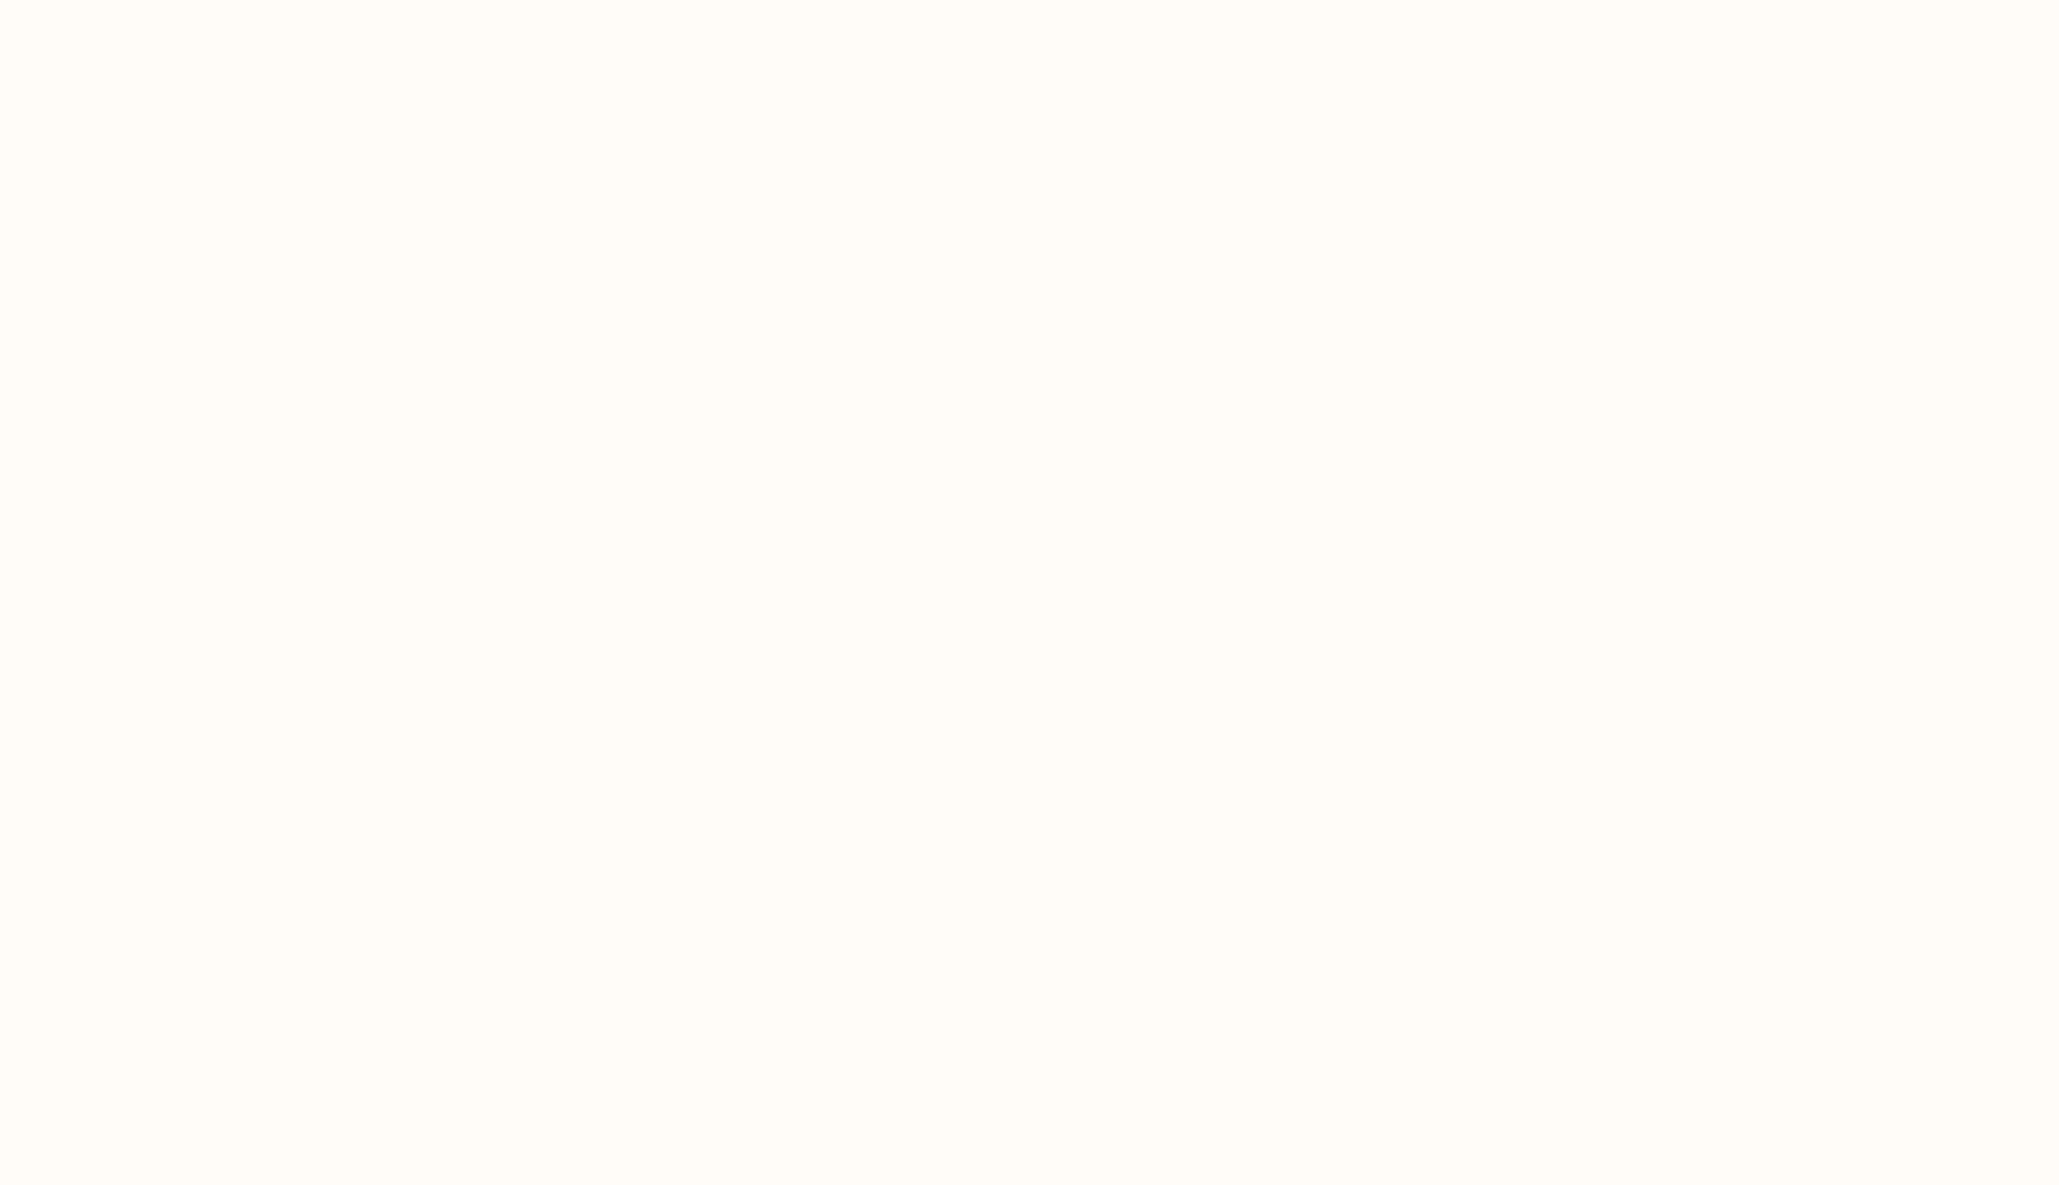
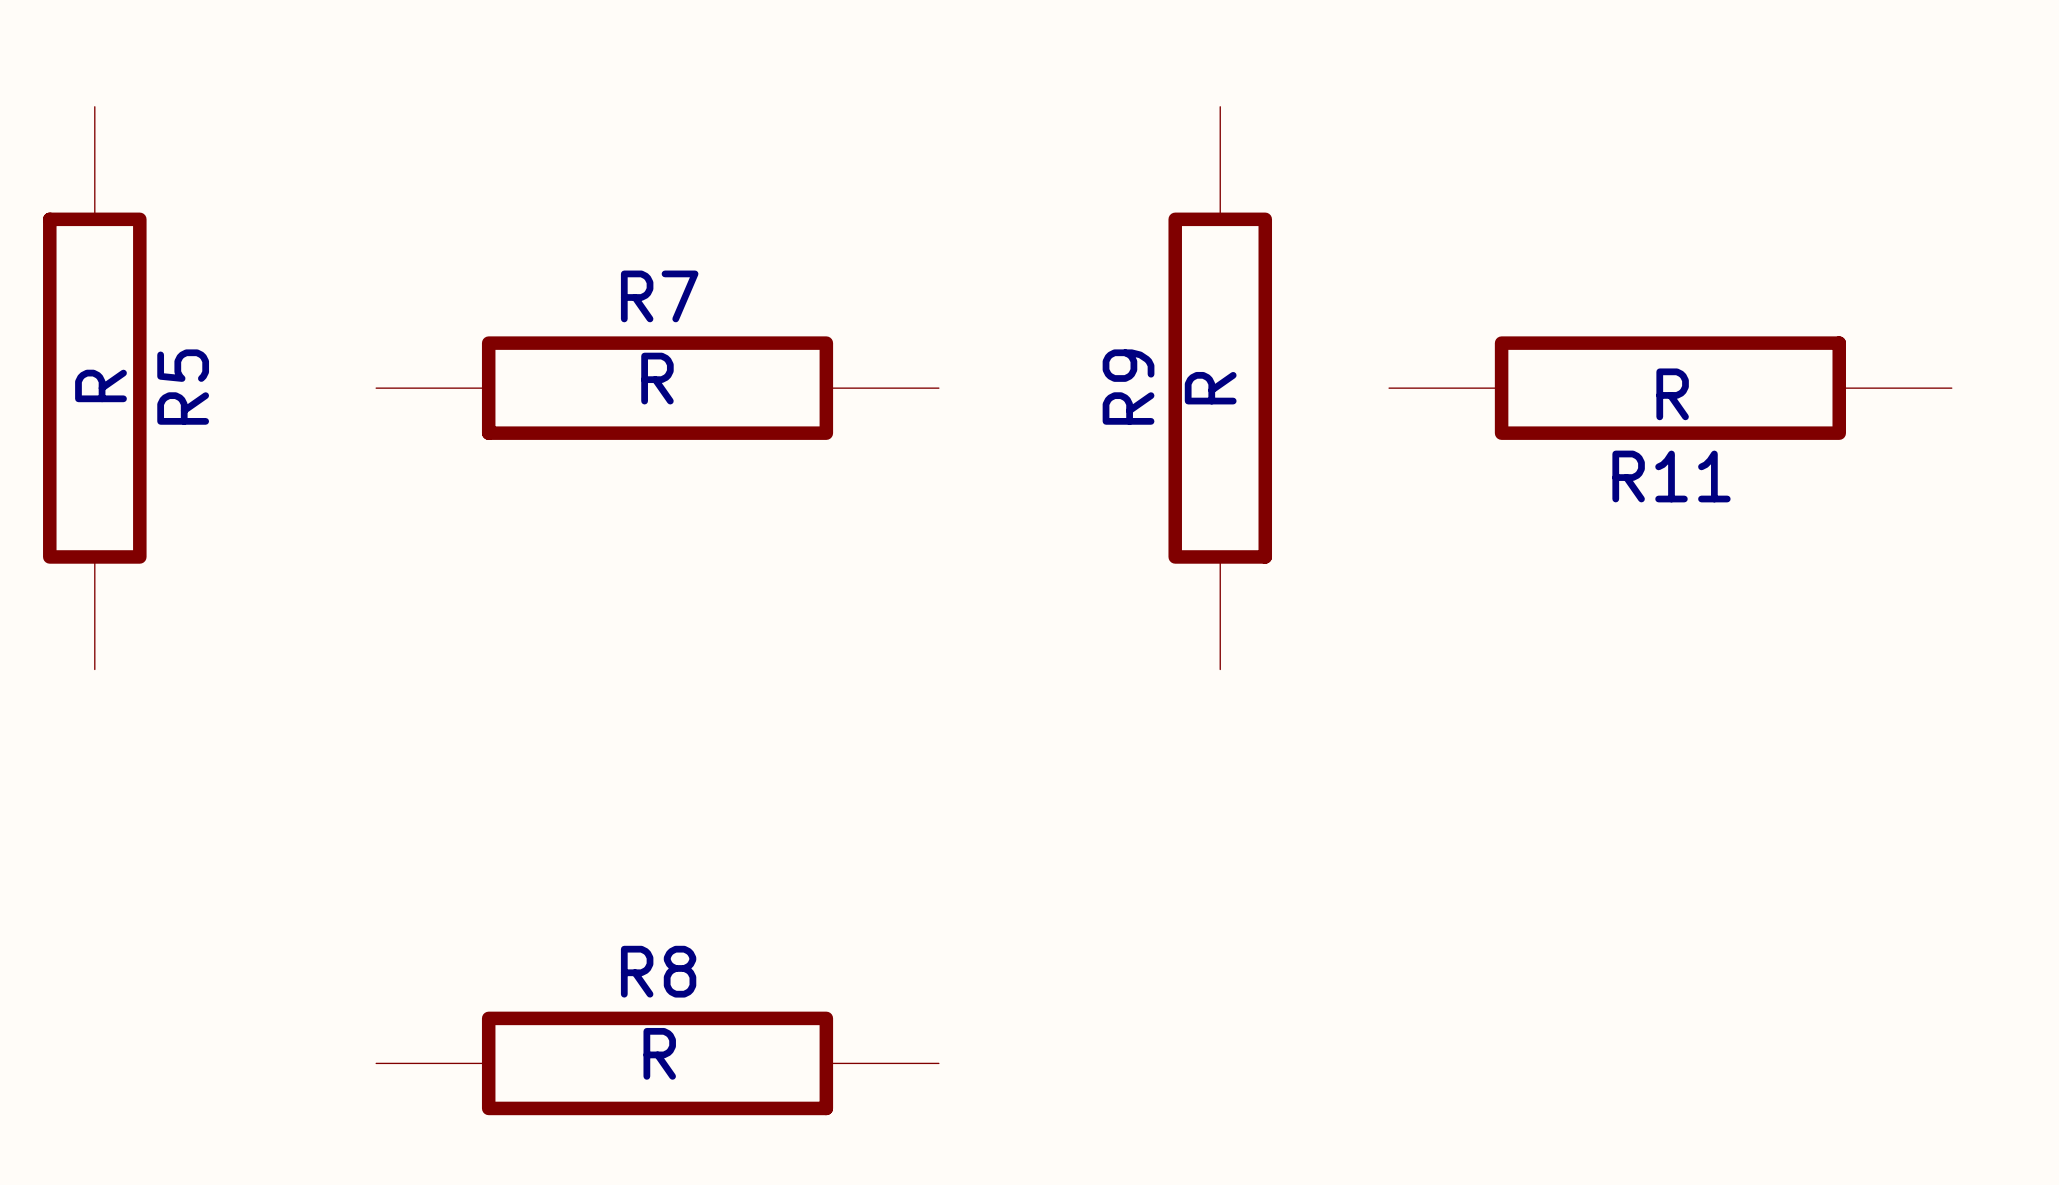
R5: none -> R (94, 388)
R7: none -> R (657, 388)
R9: none -> R (1220, 388)
R11: none -> R (1670, 388)
R8: none -> R (657, 1063)

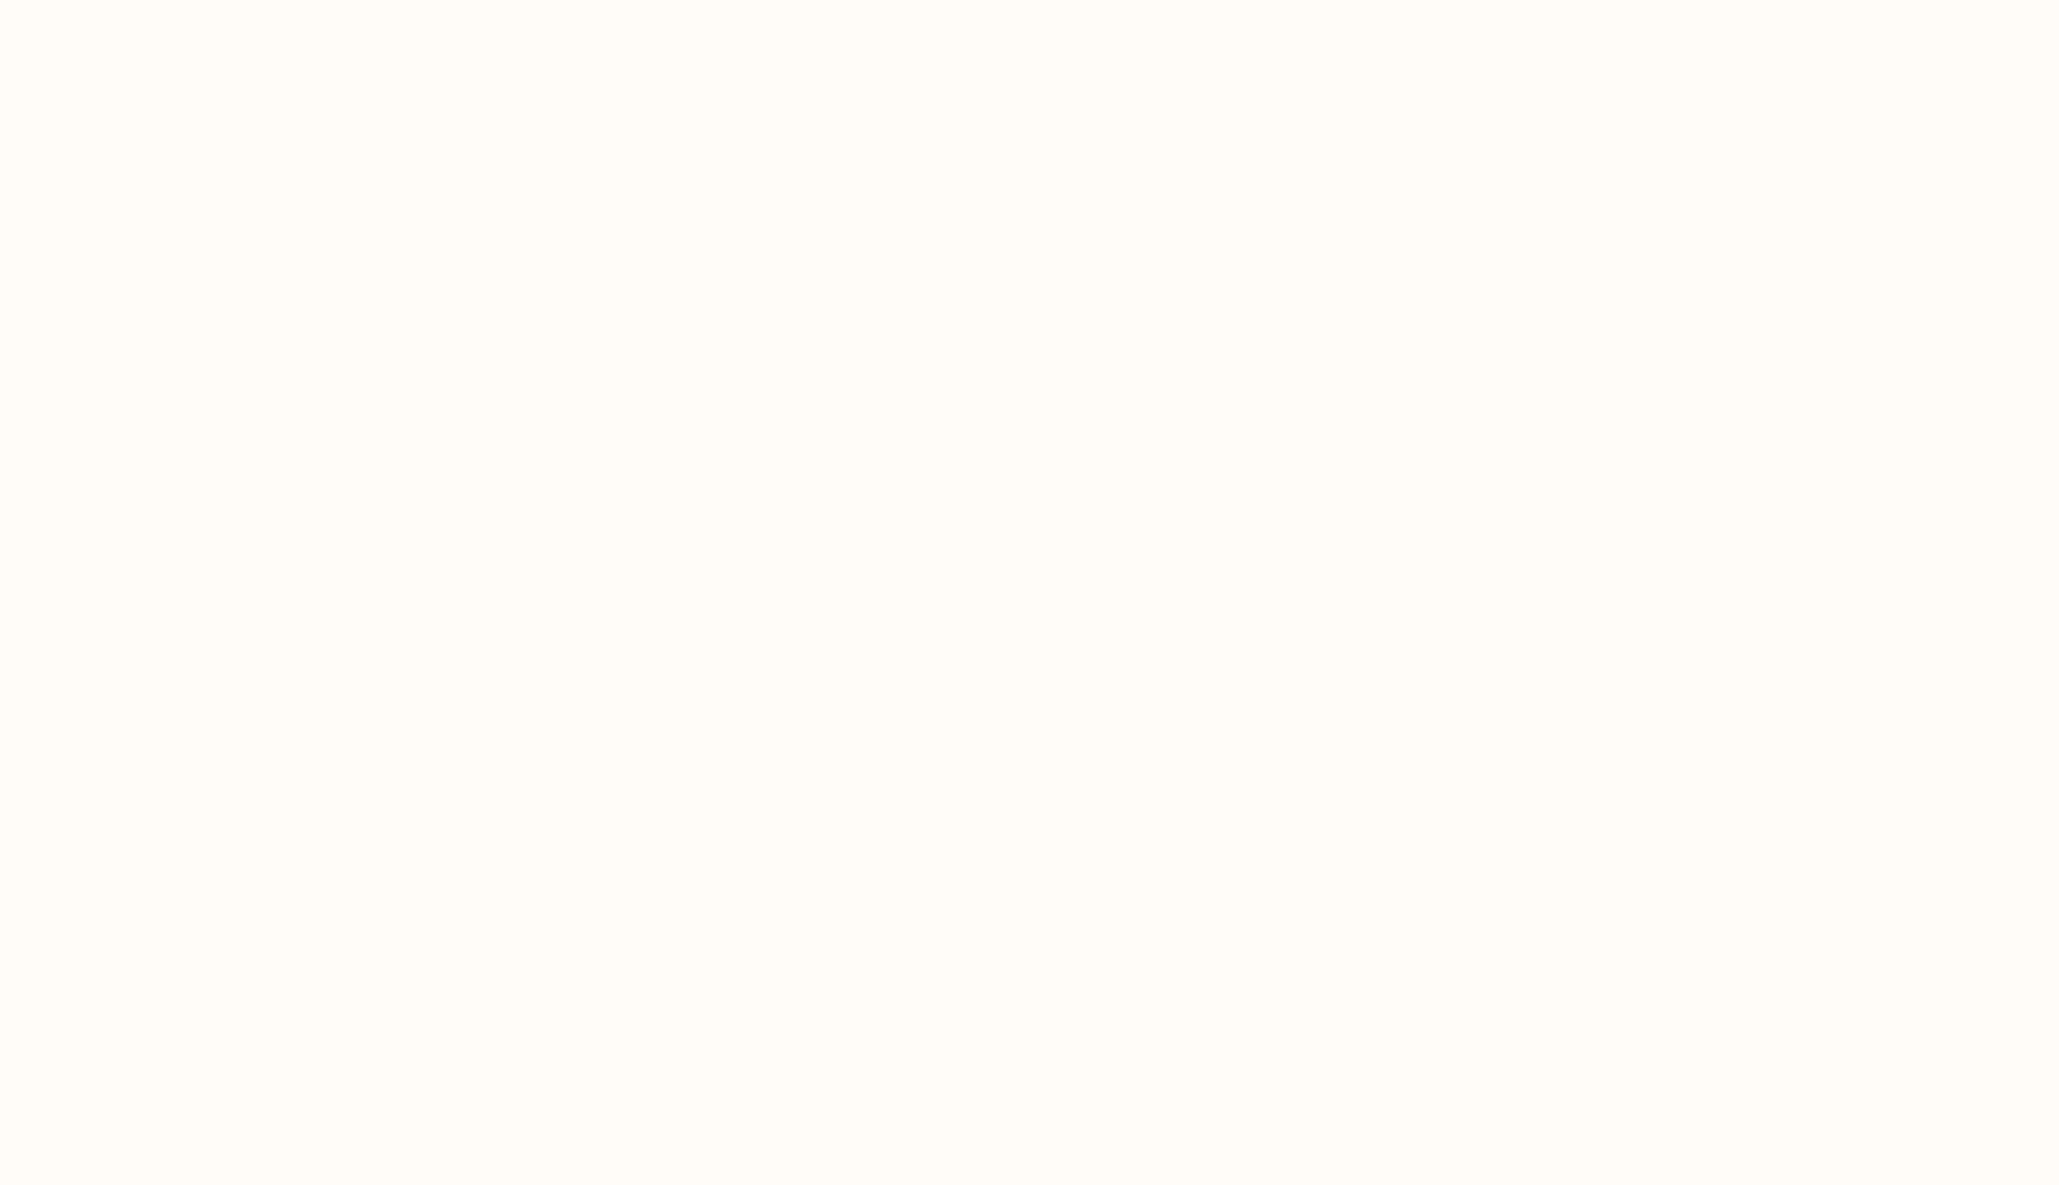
R5: R (94, 388) -> none
R7: R (657, 388) -> none
R9: R (1220, 388) -> none
R11: R (1670, 388) -> none
R8: R (657, 1063) -> none

